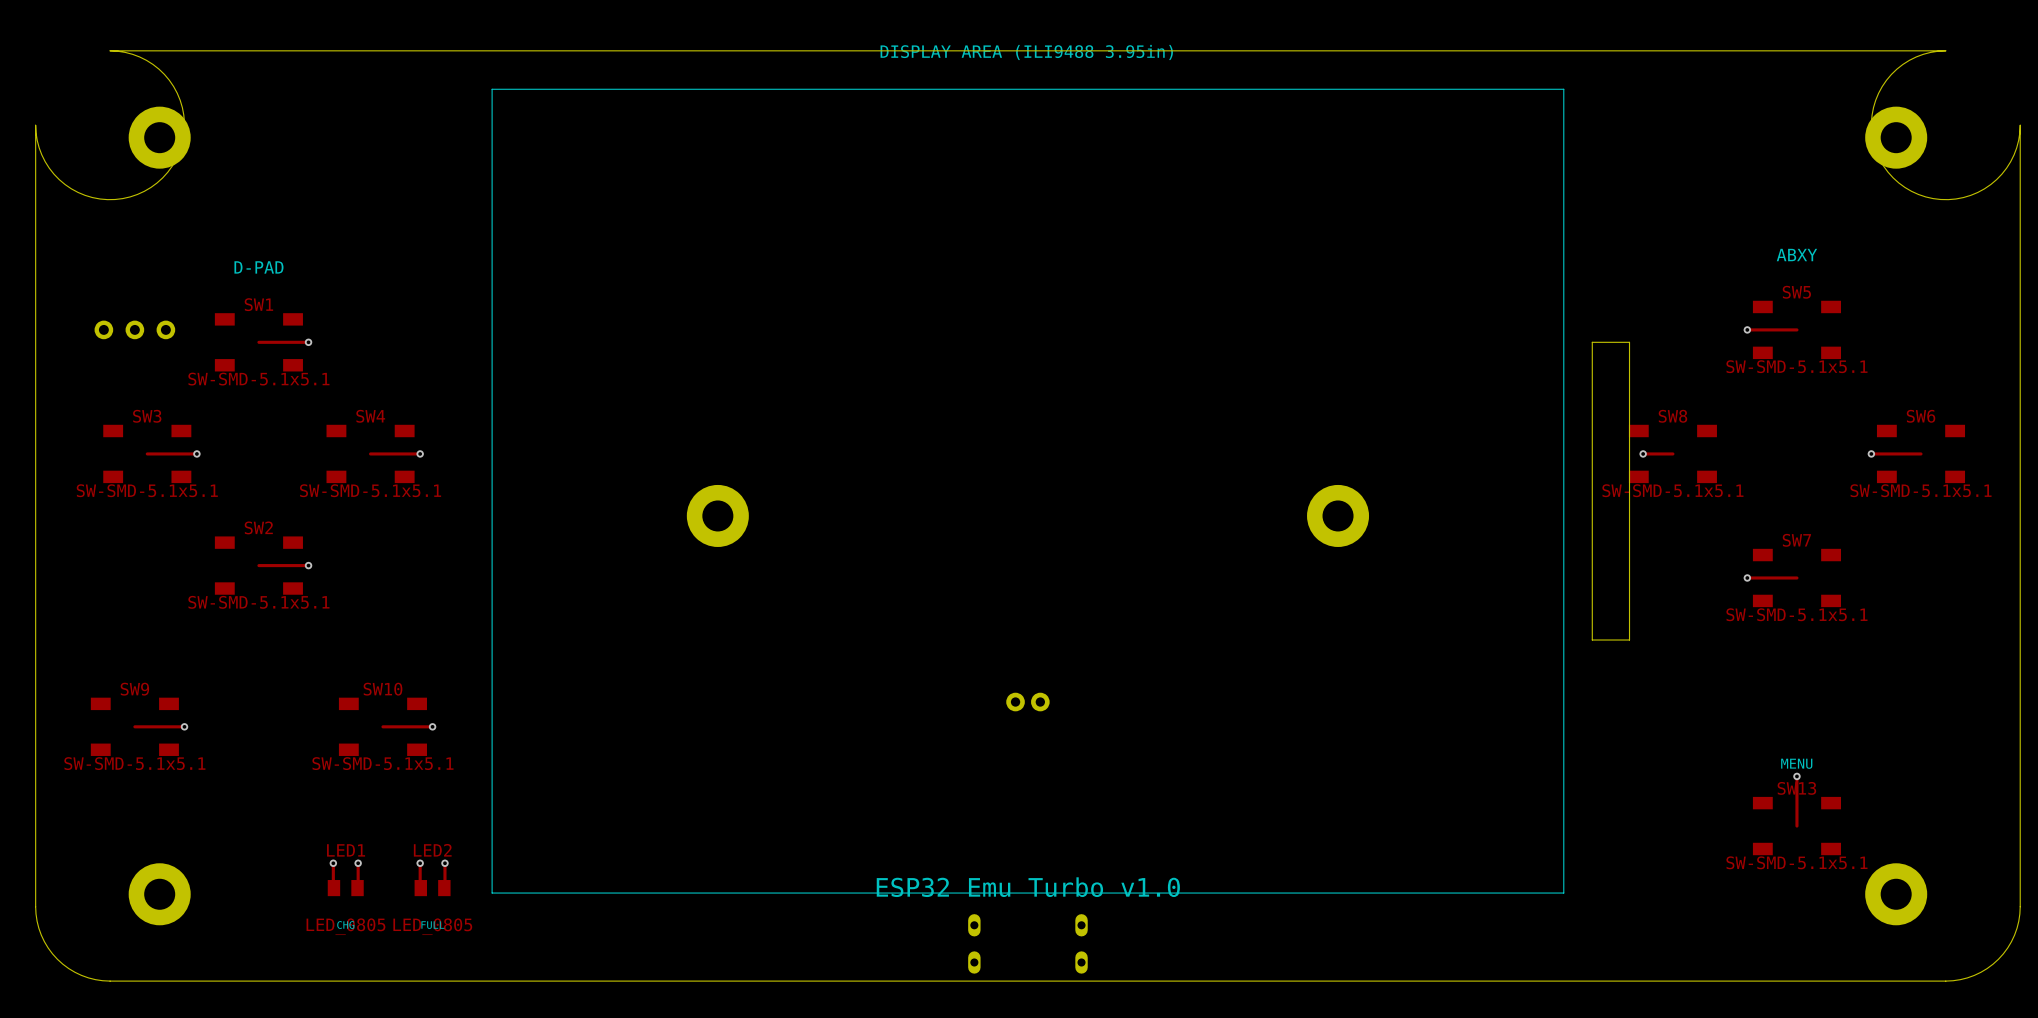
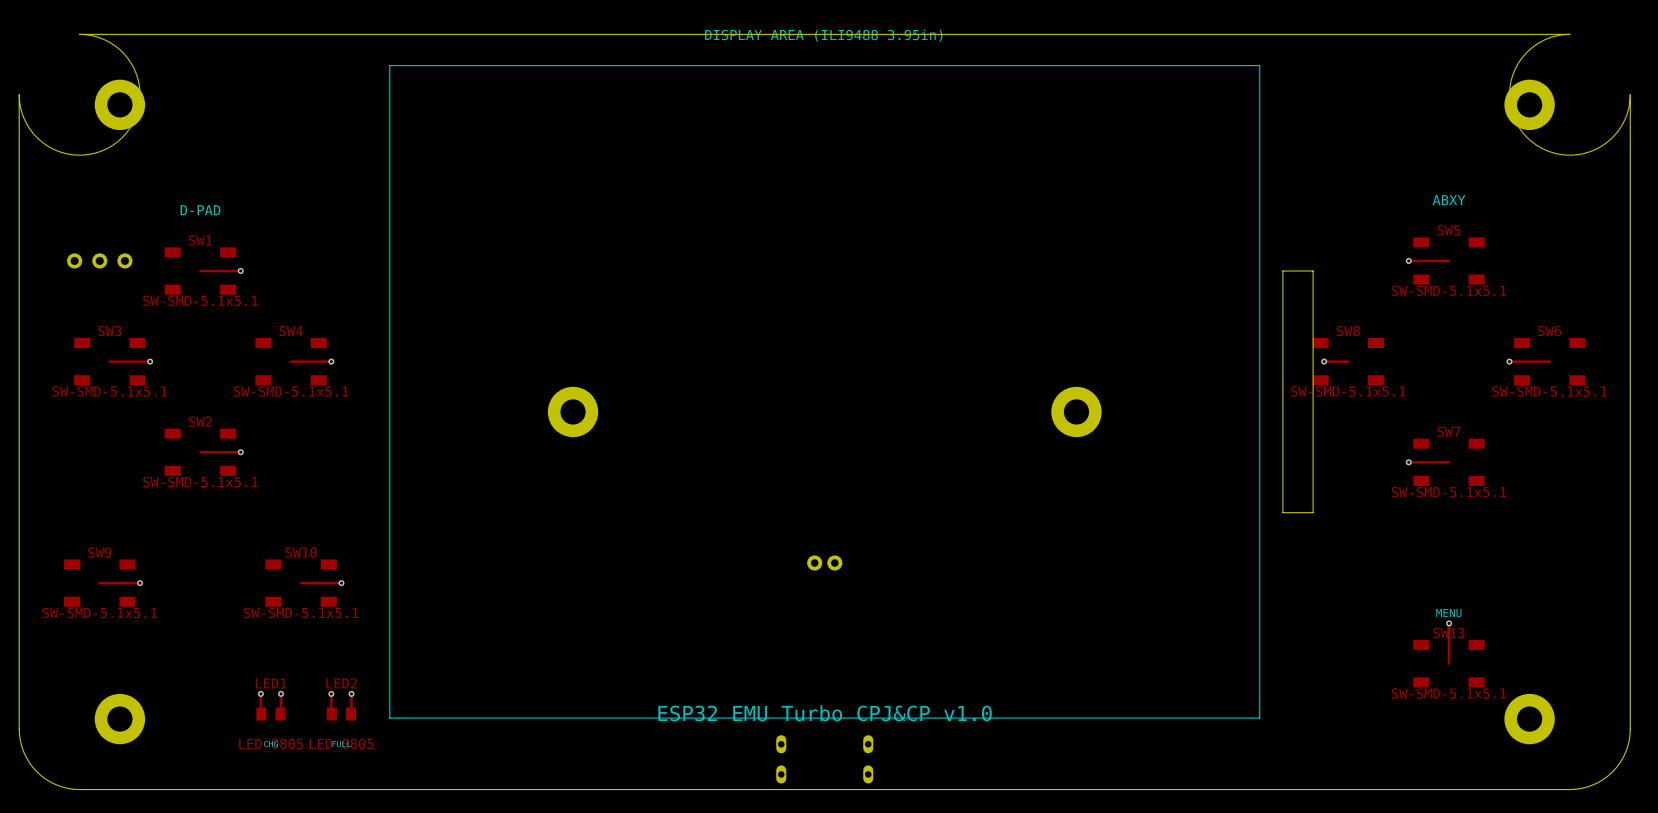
text: ESP32 Emu Turbo v1.0 (1028, 887) -> ESP32 EMU Turbo CPJ&CP v1.0 (825, 713)

